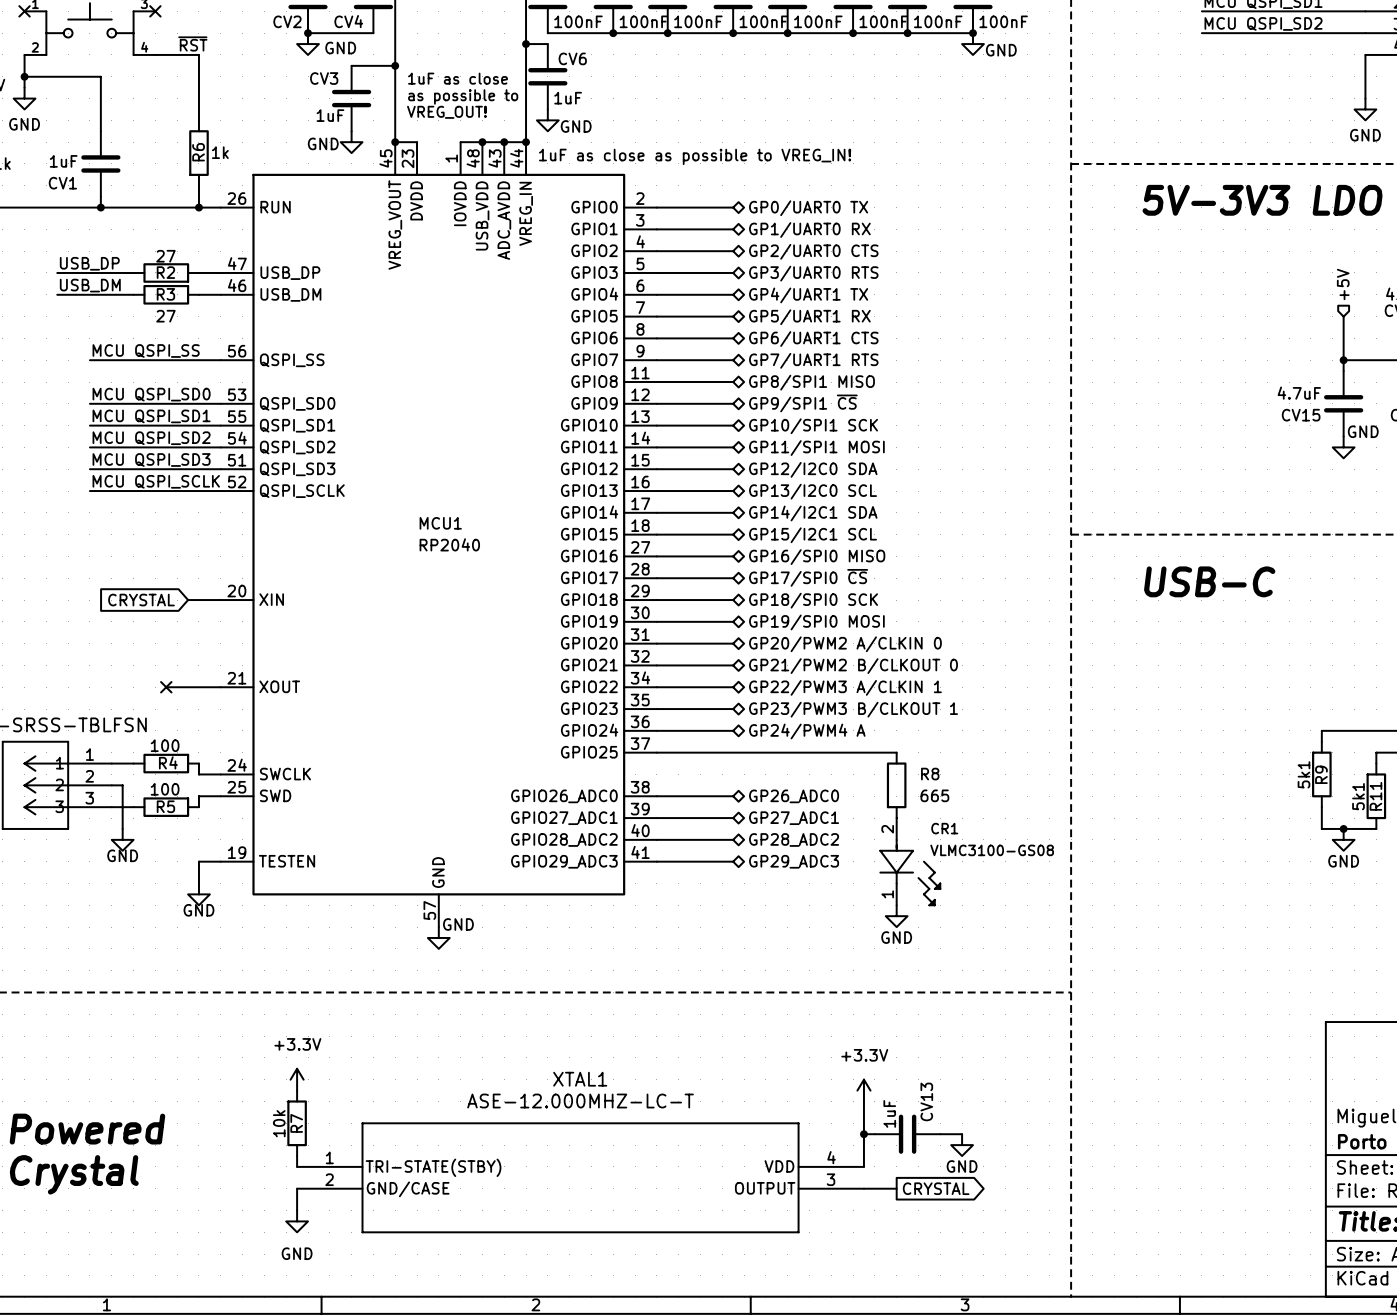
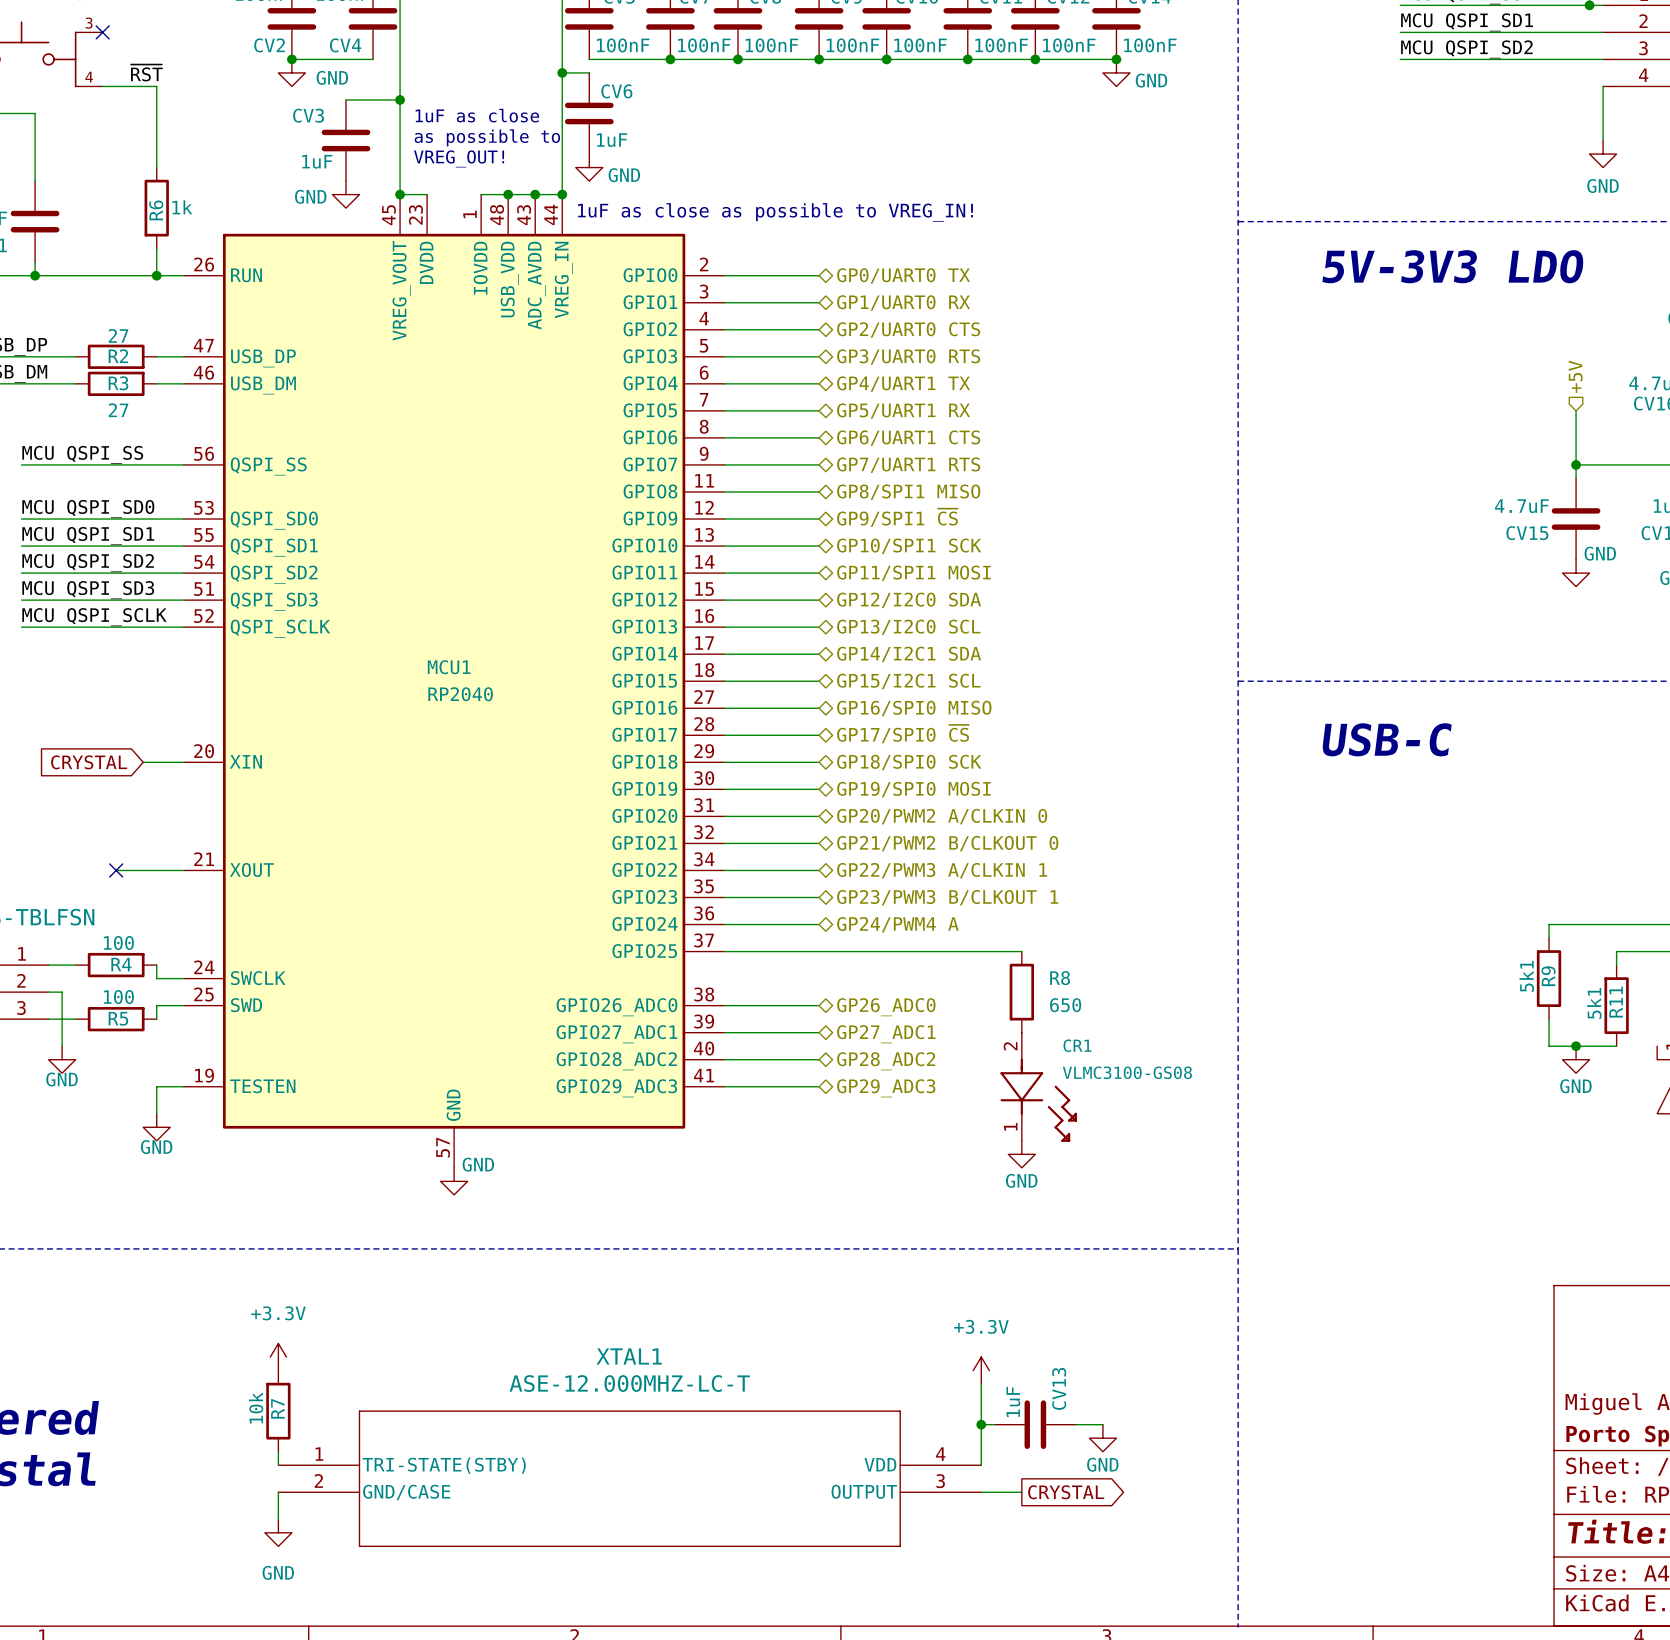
R8 value: 665 (934, 795) -> 650 (1065, 1005)

